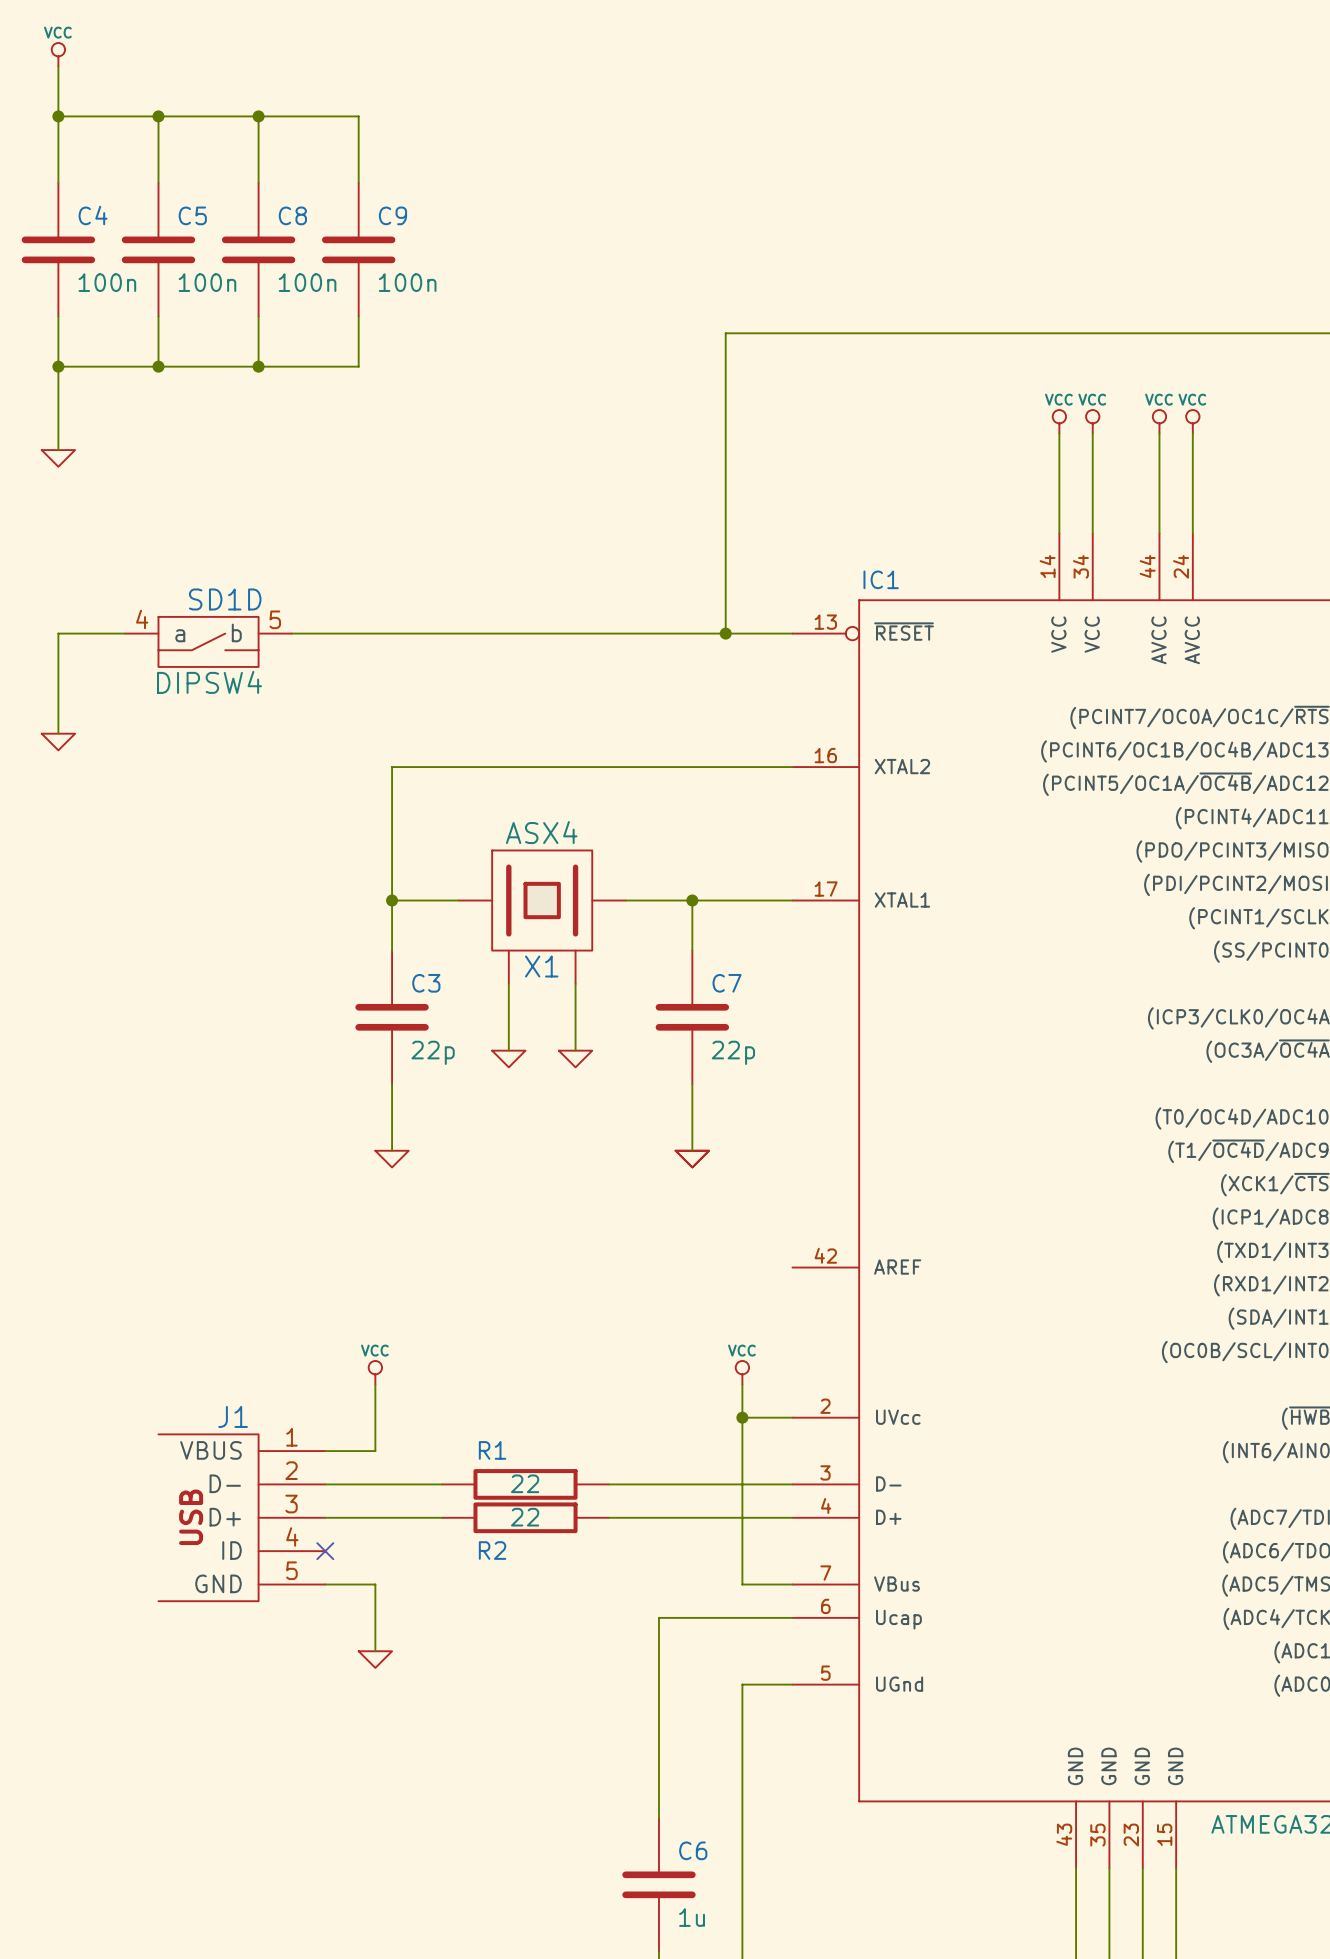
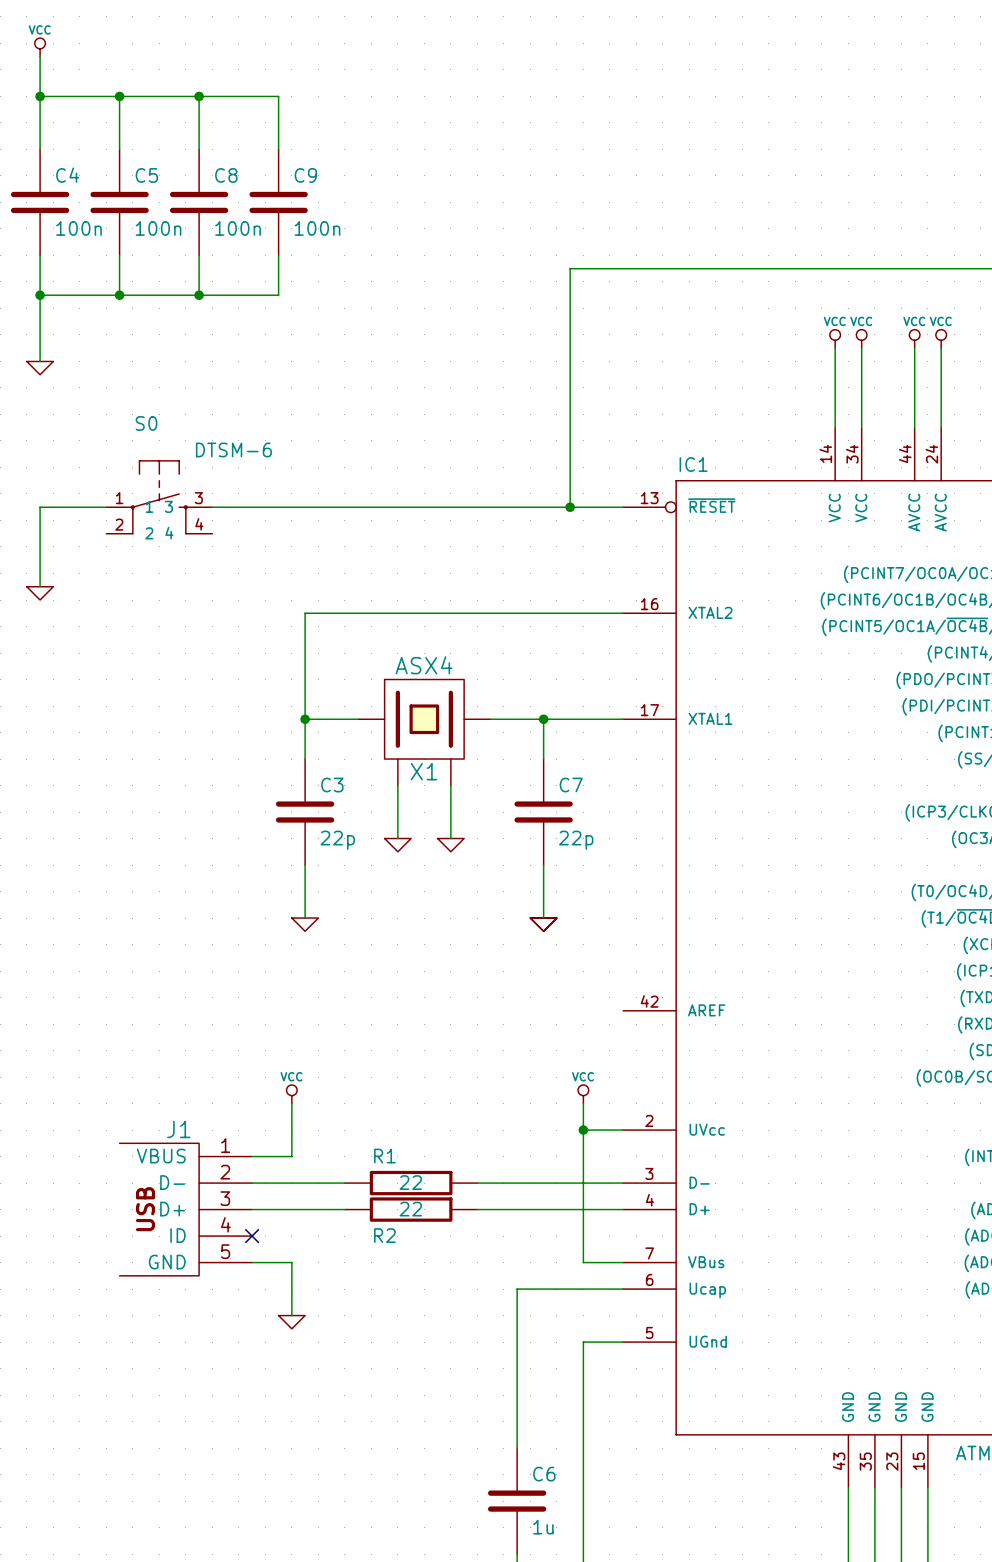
S0: none -> DTSM-6 (159, 497)
SD1D: DIPSW4 (208, 641) -> none

